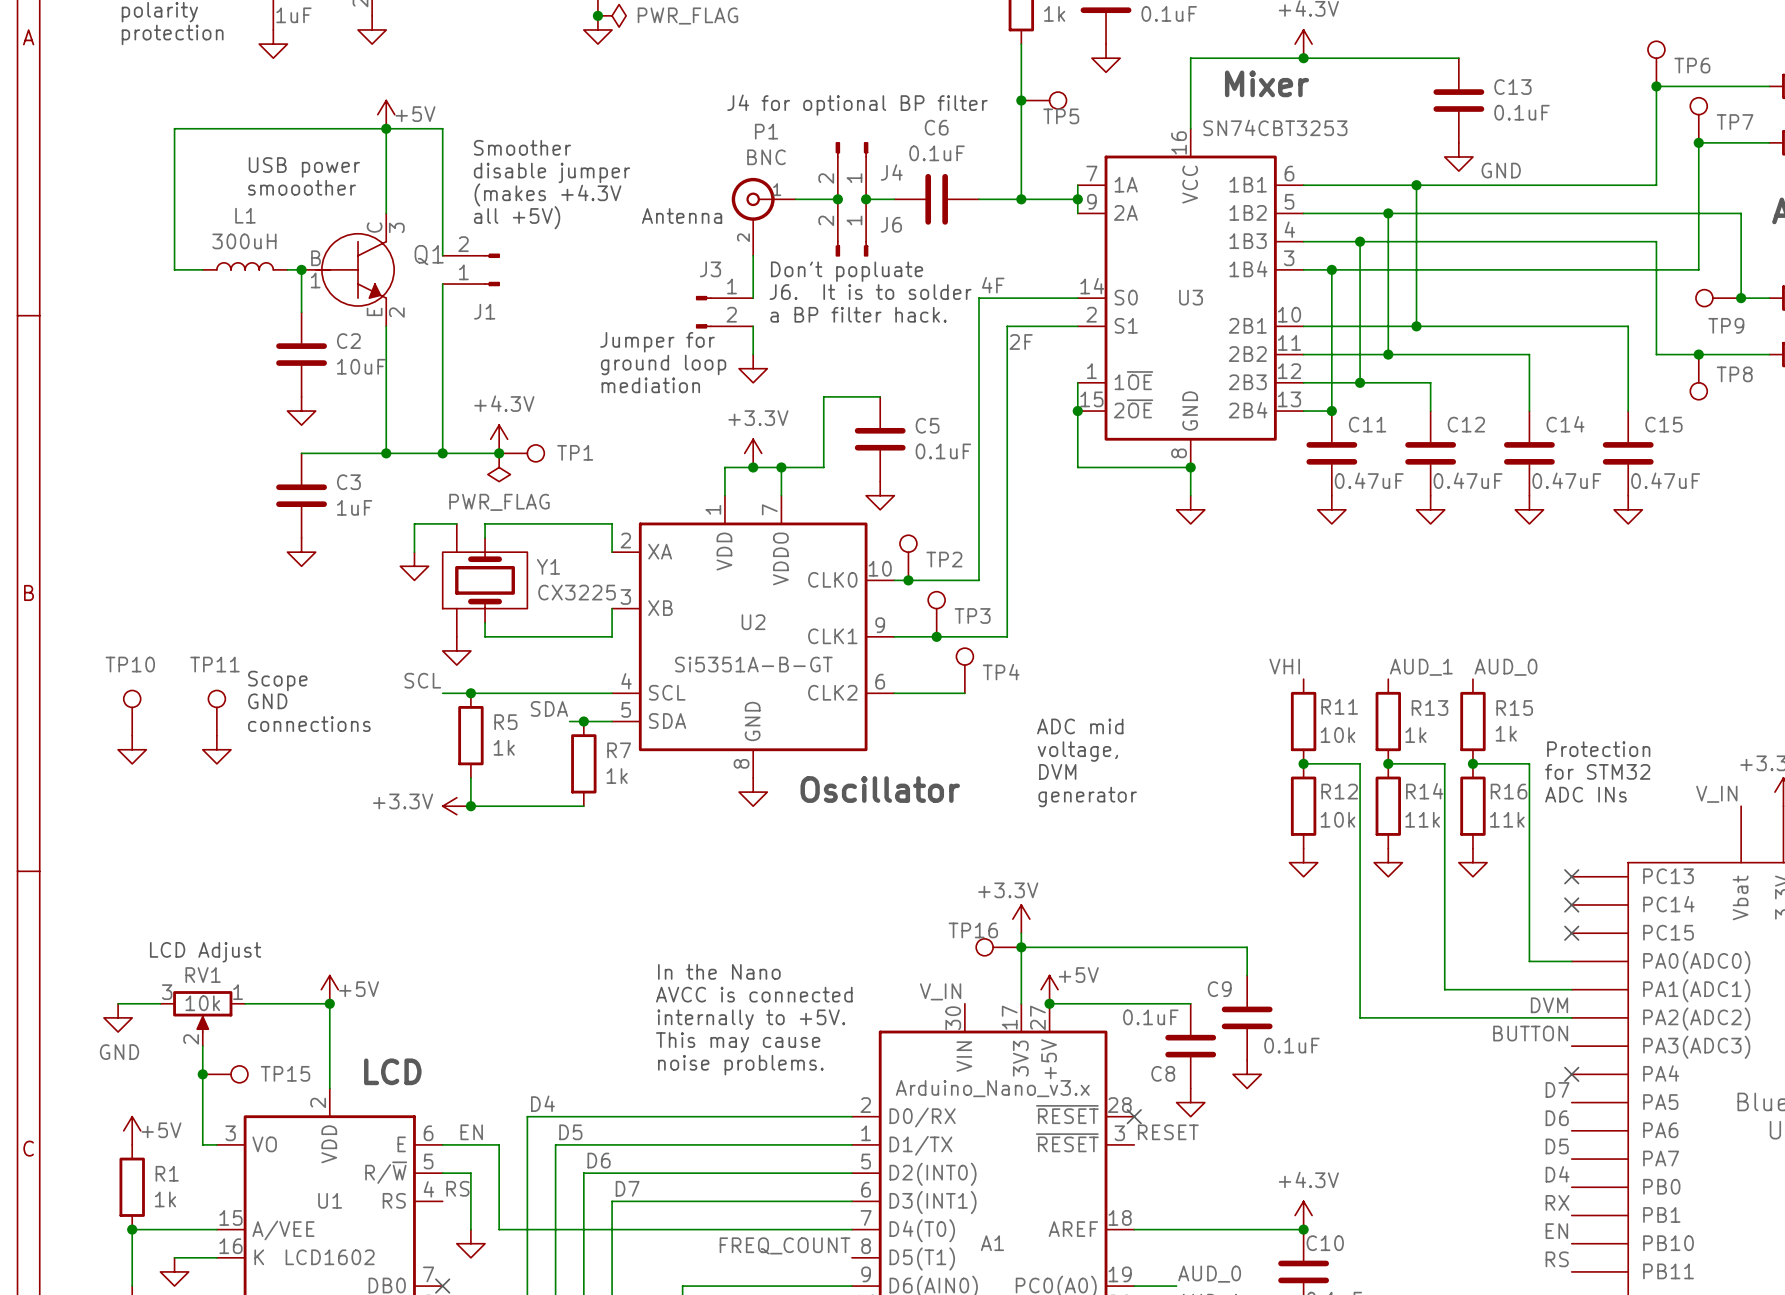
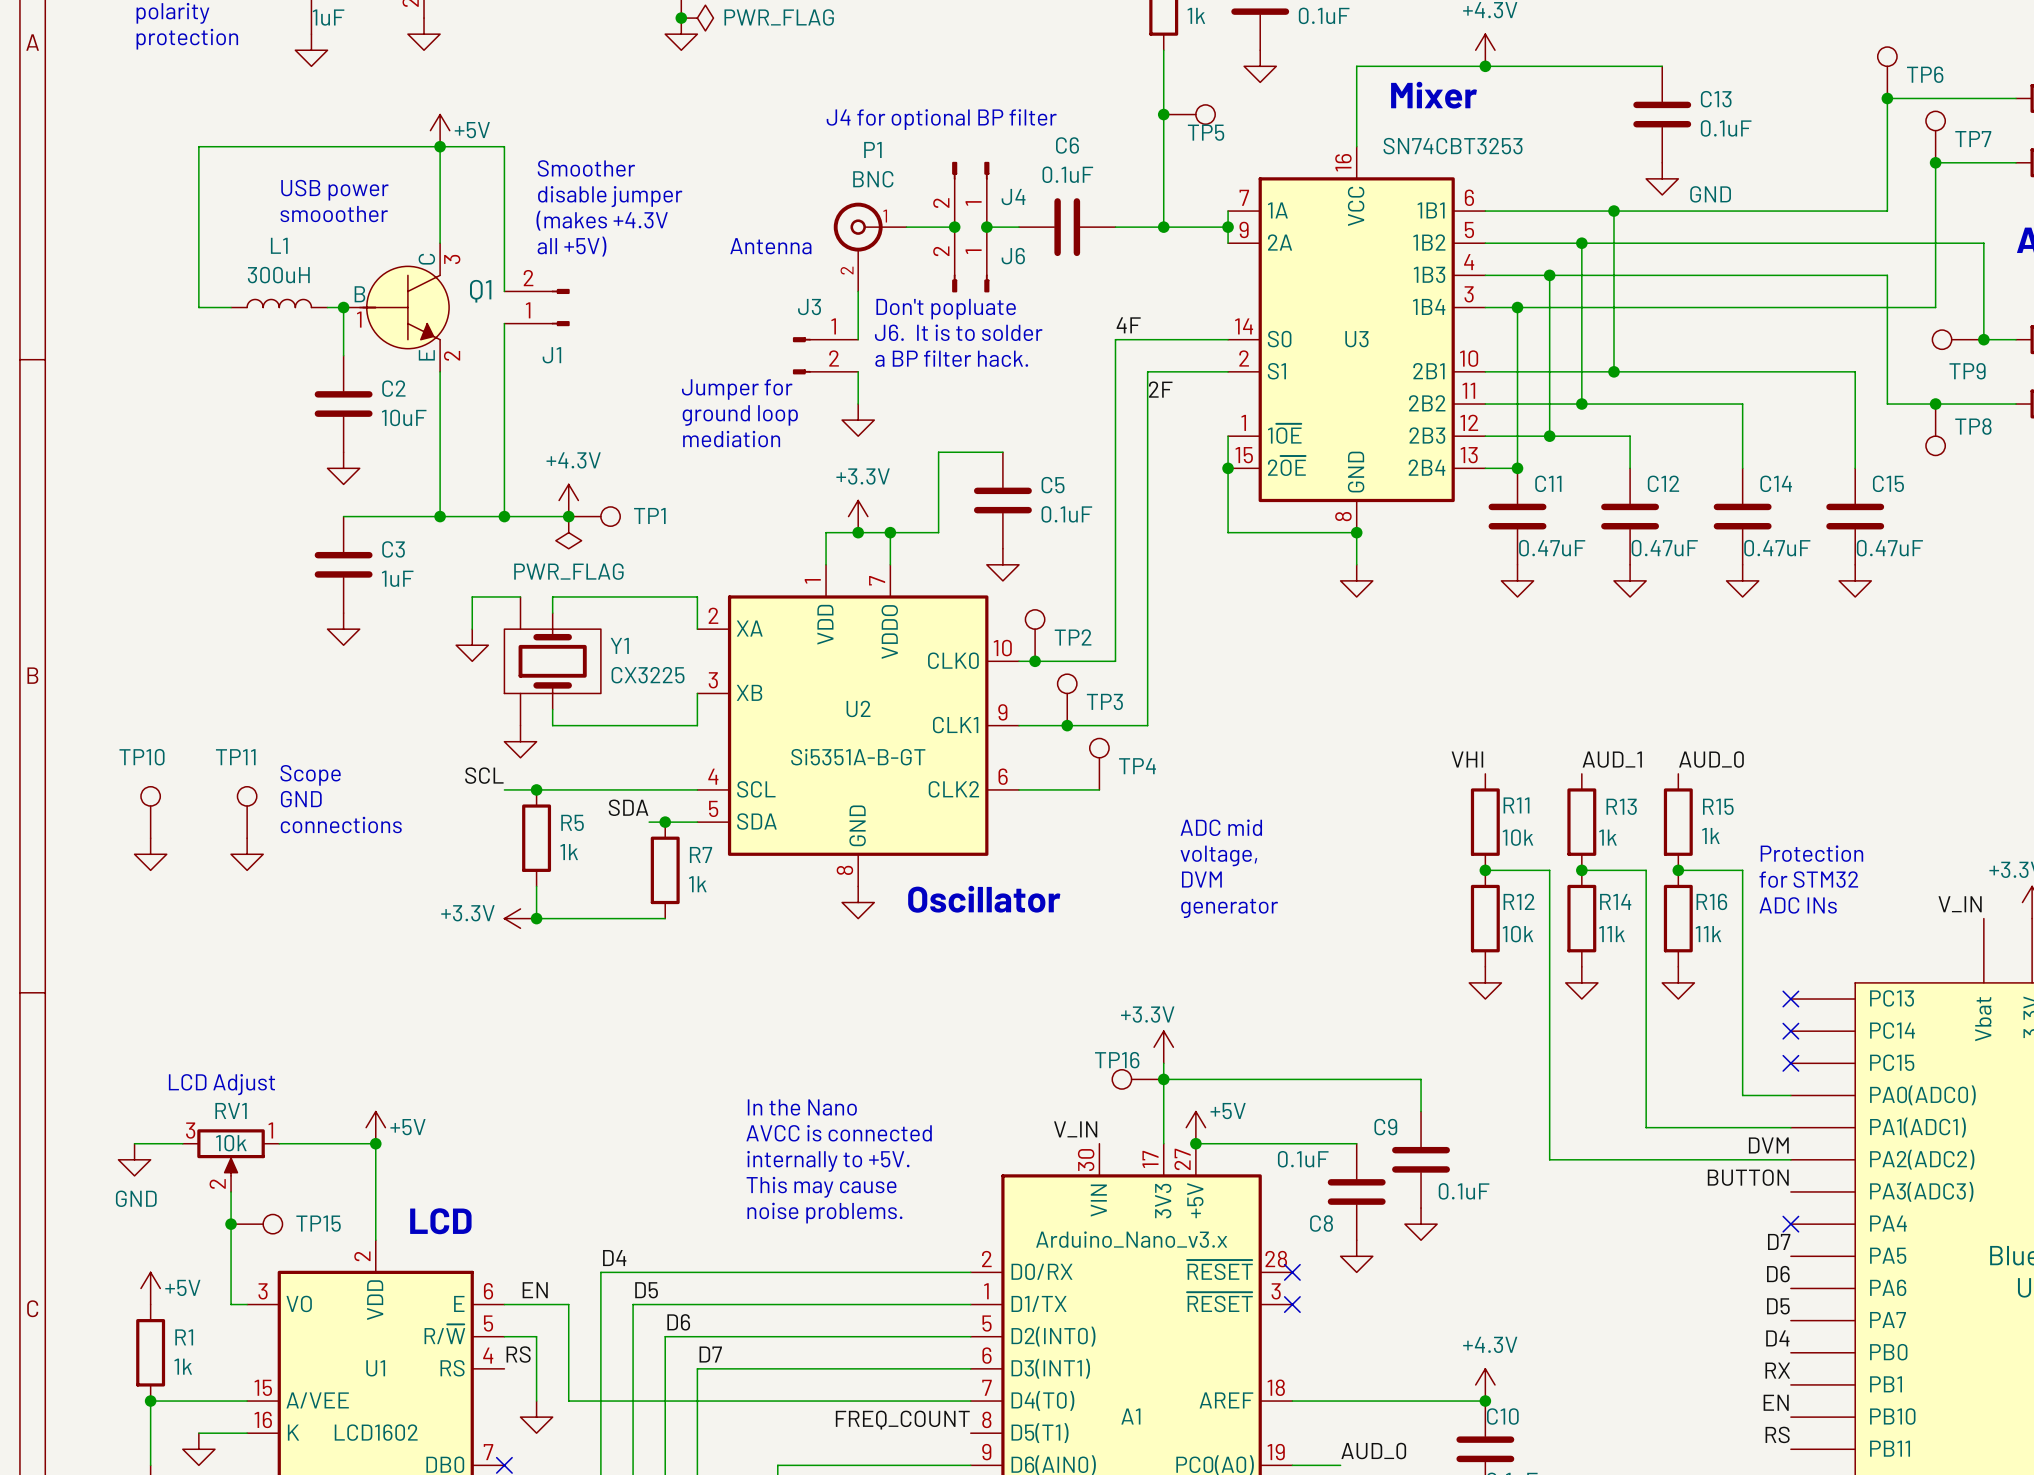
label: RESET (1168, 1132) -> none
no-connect mark: none -> (1292, 1304)

